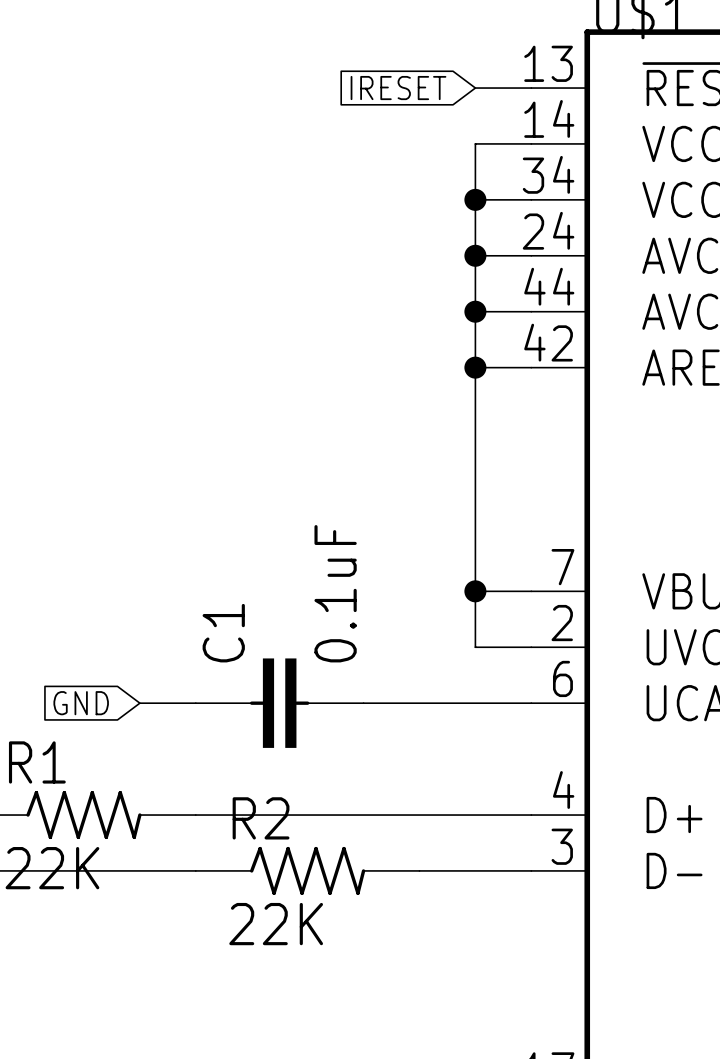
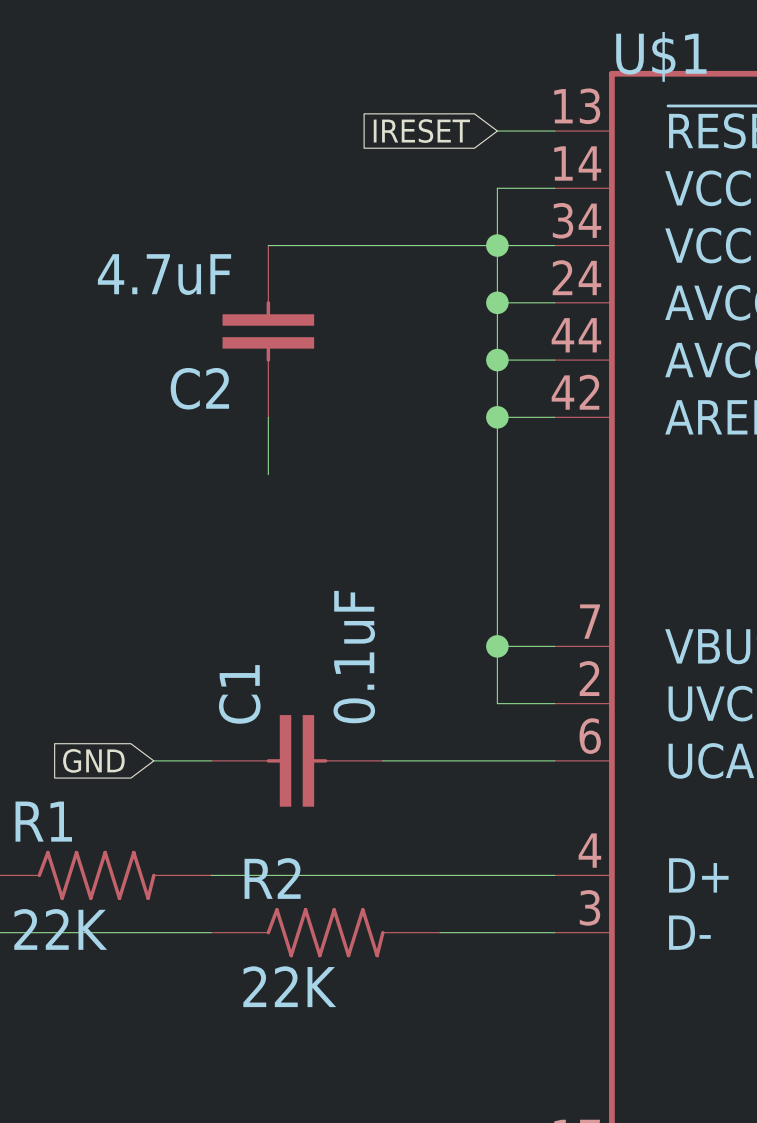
wire: none -> (268, 245) (497, 245)
C2: none -> 4.7uF (268, 331)
wire: none -> (268, 417) (268, 474)

